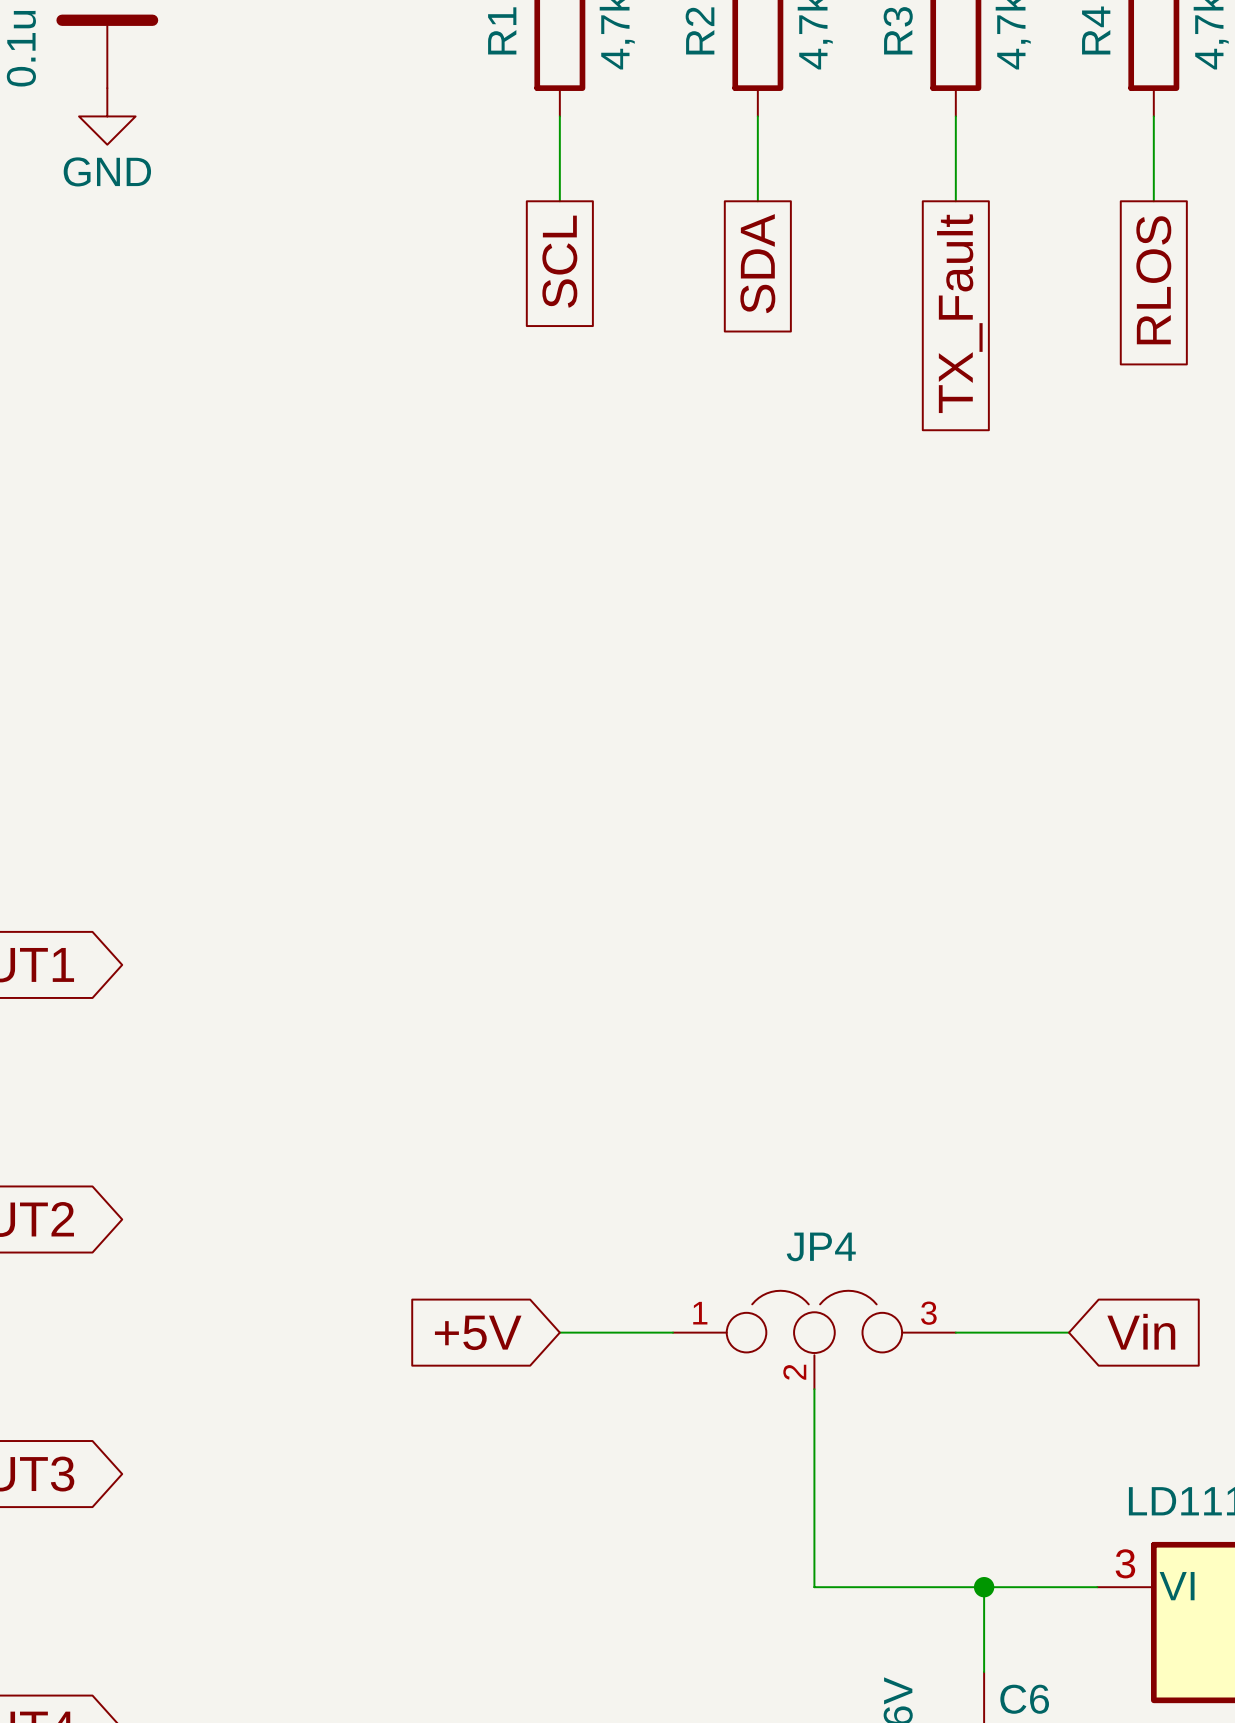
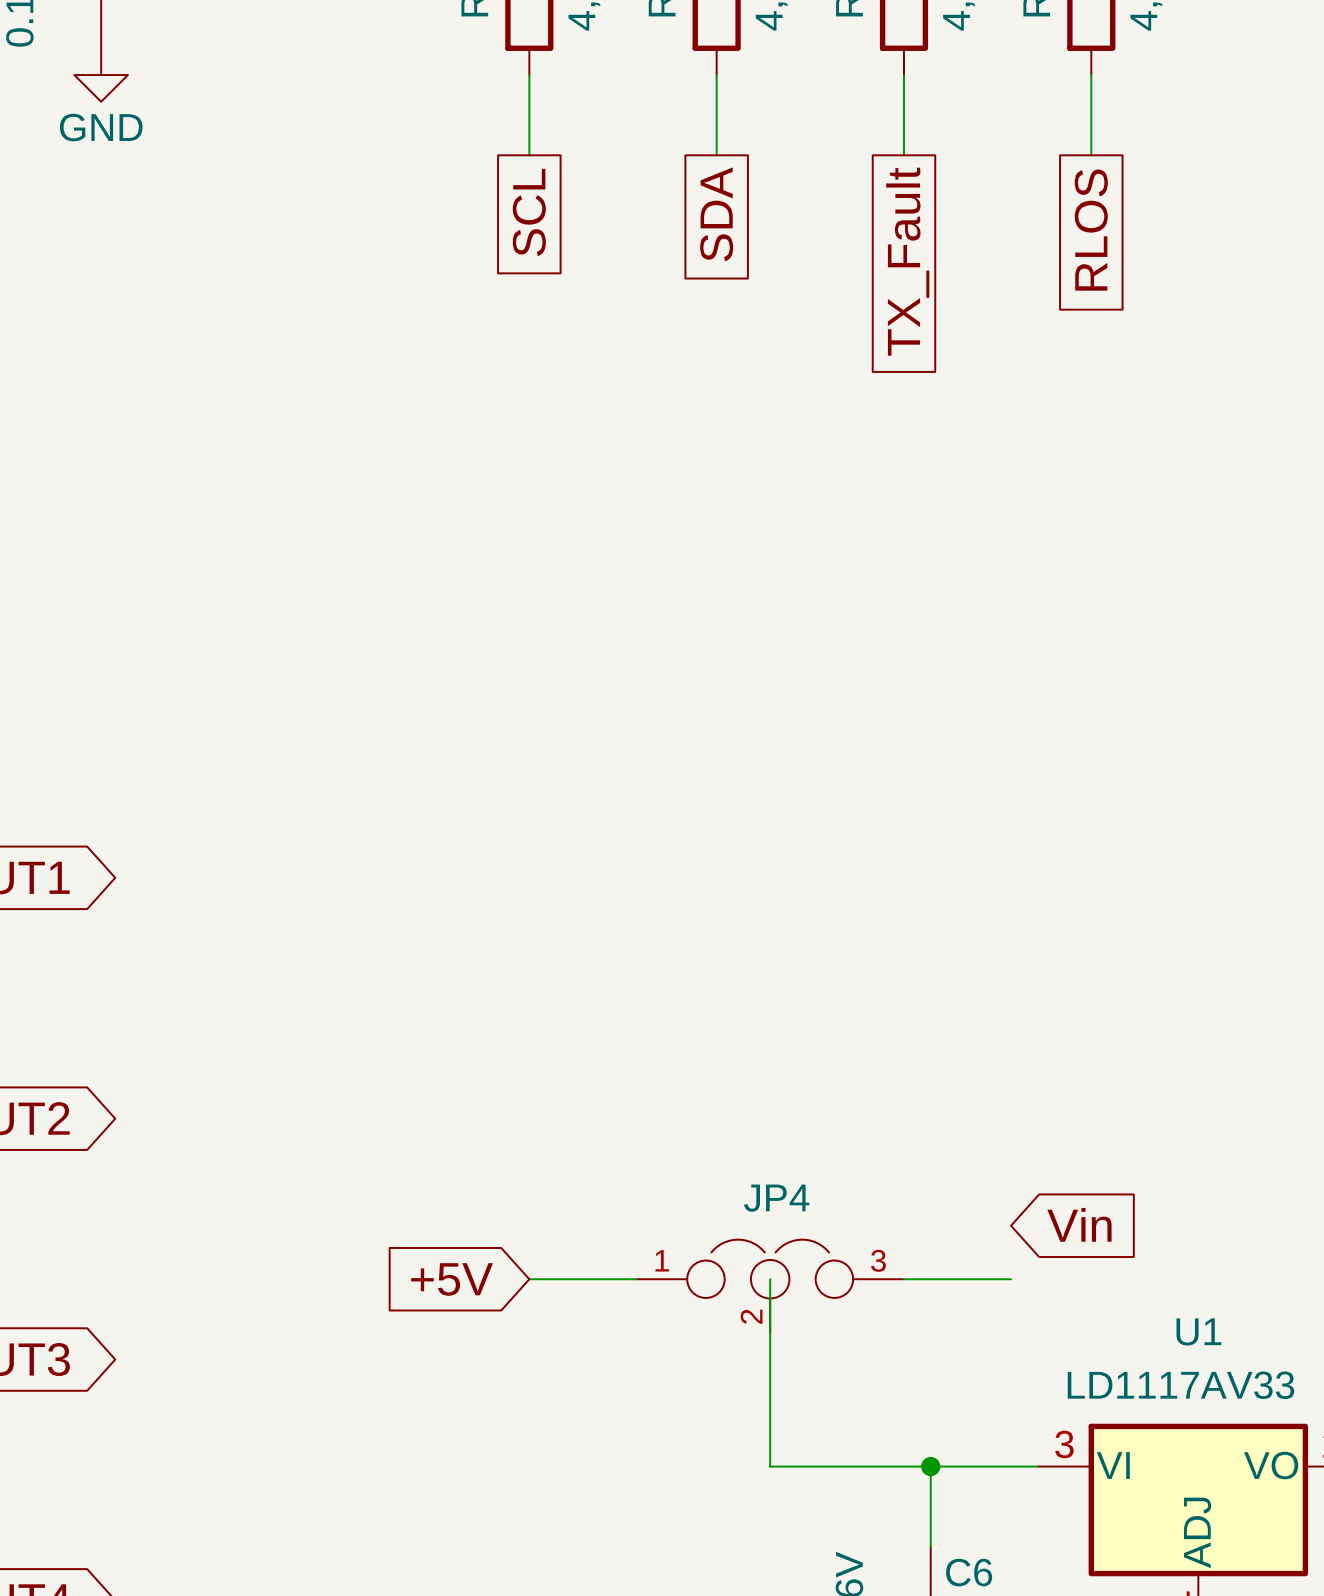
global label position: +5V (478, 1332) -> +5V (452, 1279)
wire: (559, 1332) (672, 1332) -> (529, 1279) (636, 1279)
wire: (955, 1332) (1068, 1332) -> (903, 1279) (1011, 1279)
JP4 position: (814, 1339) -> (770, 1286)

